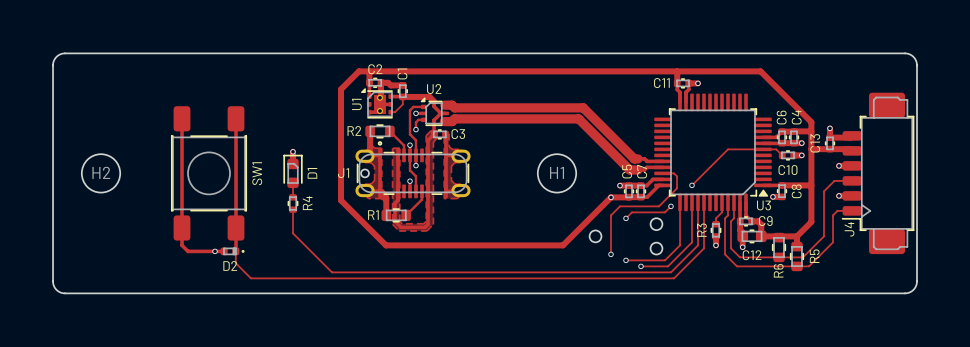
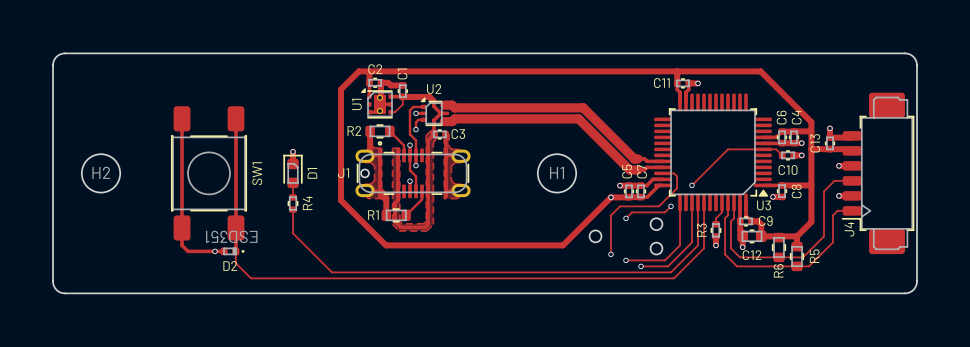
D2 value: none -> ESD351 (231, 236)

